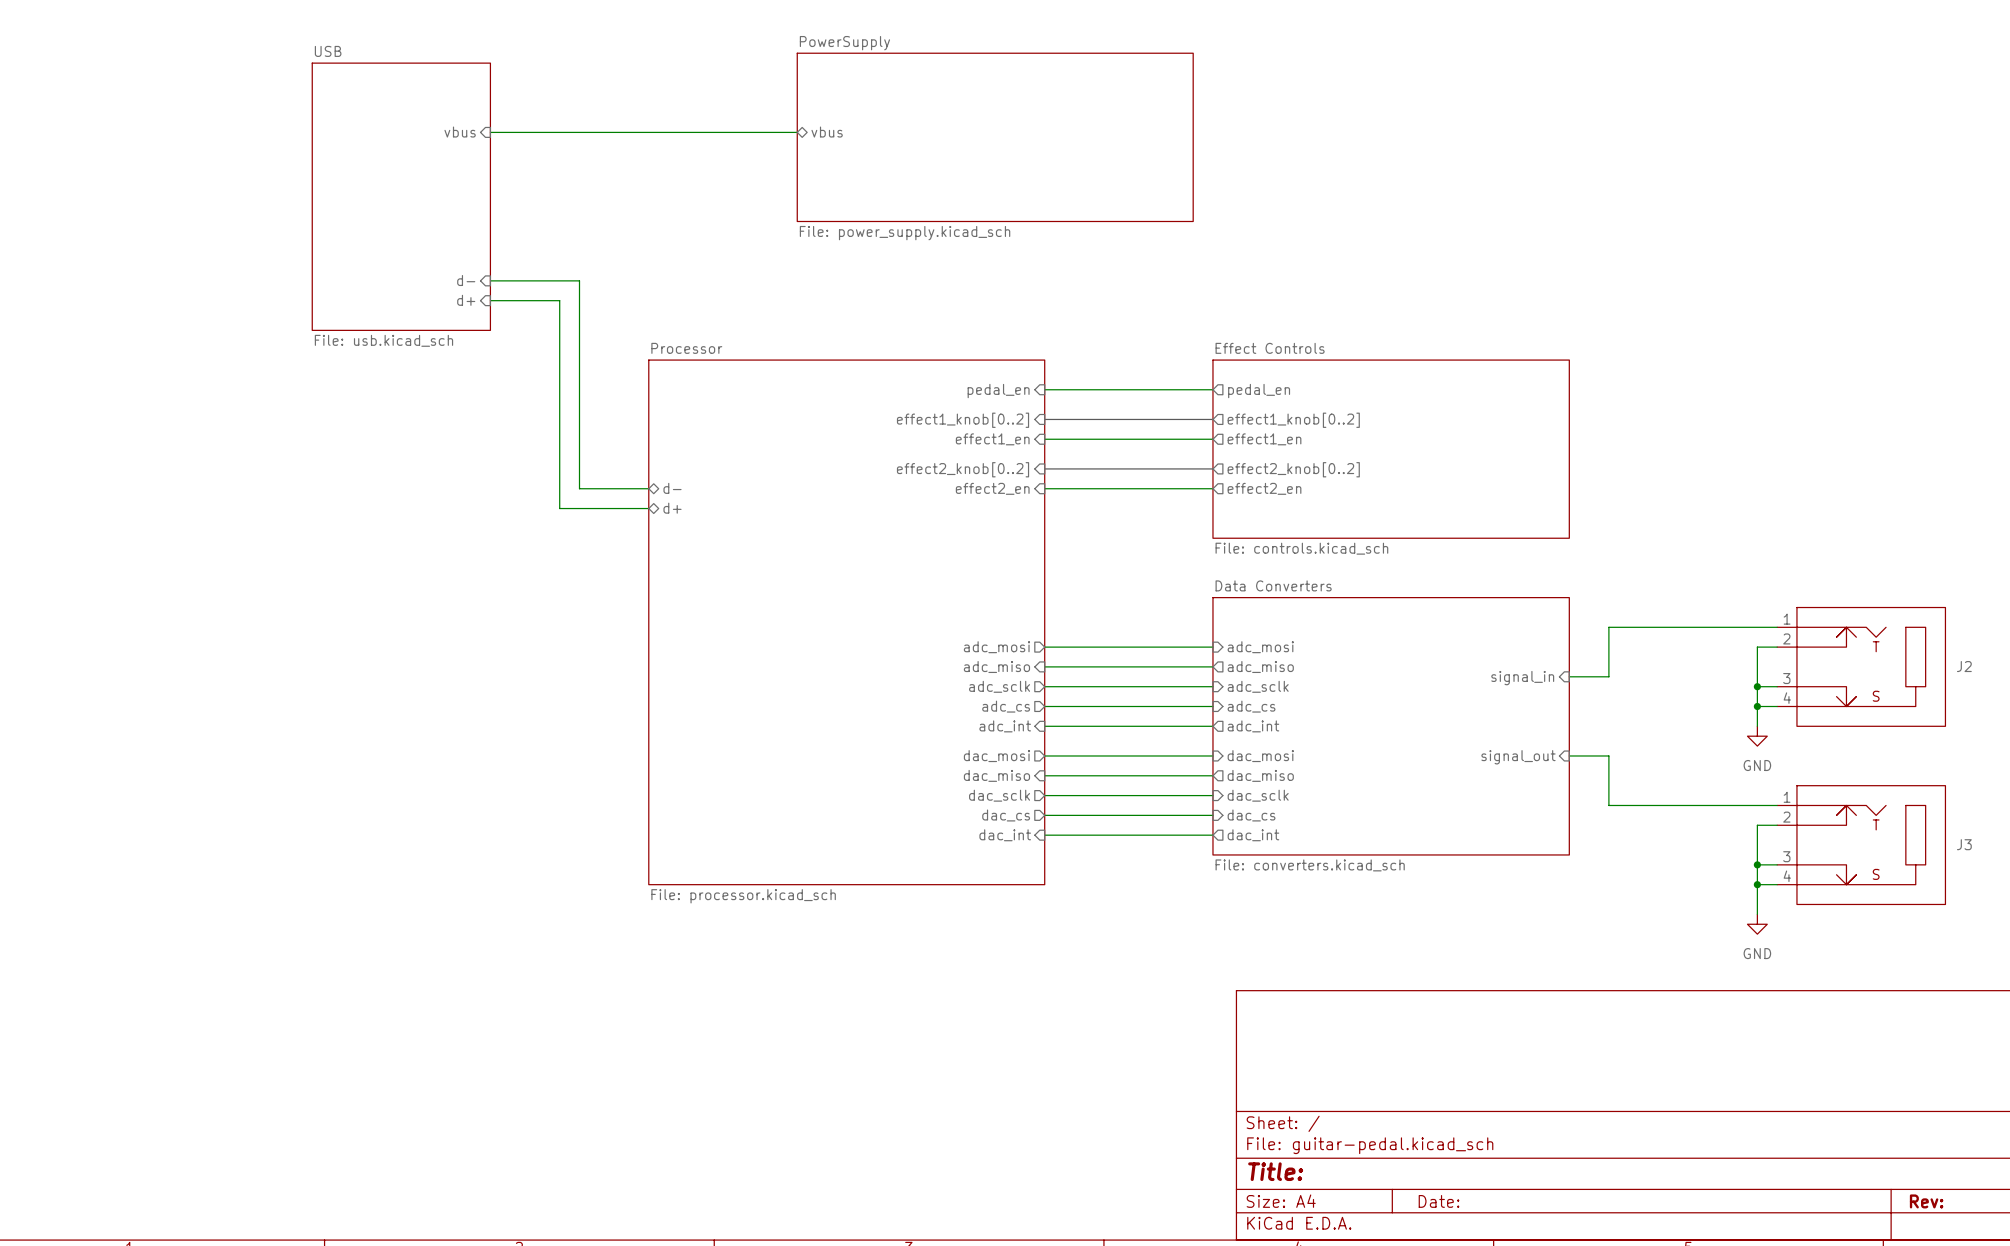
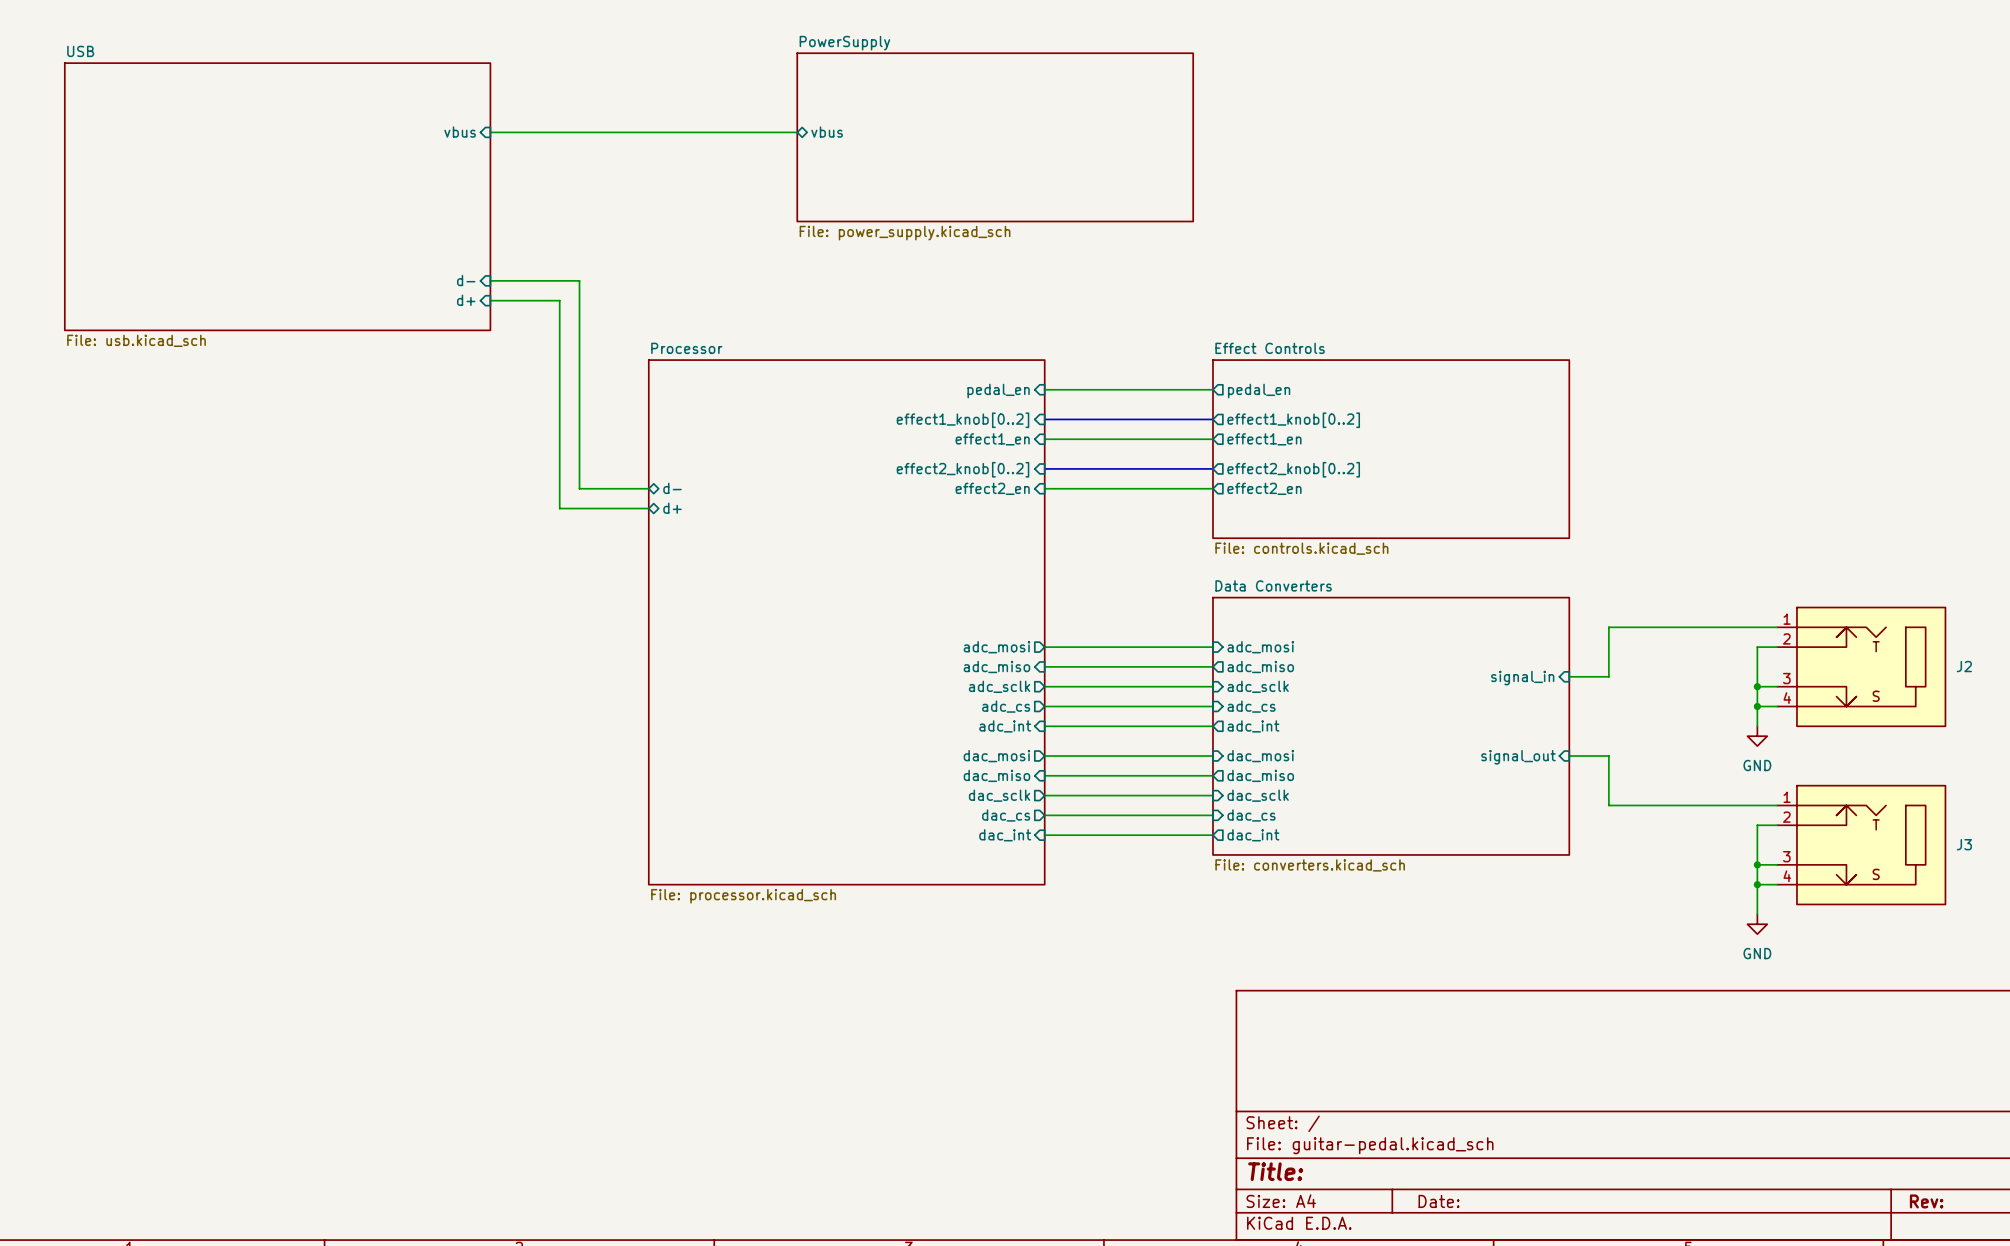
sheet USB: none -> File: usb.kicad_sch (277, 196)
sheet USB: File: usb.kicad_sch (401, 196) -> none

